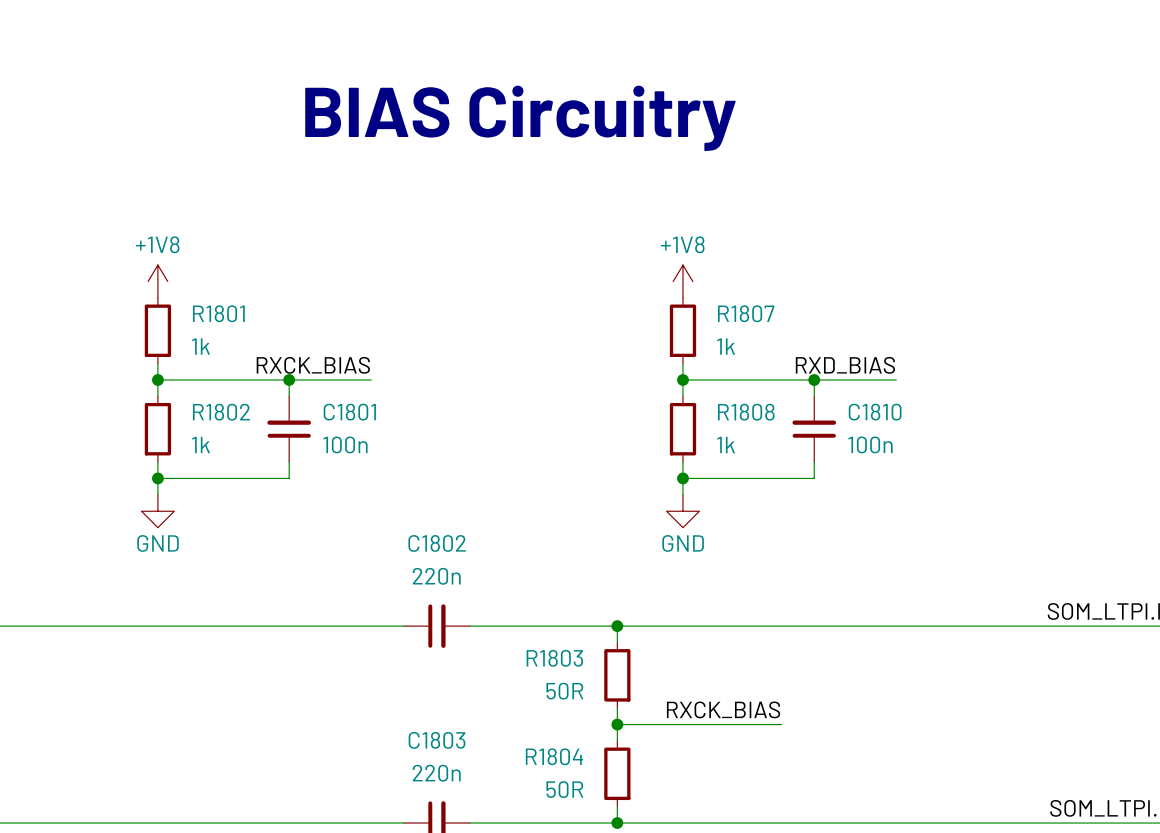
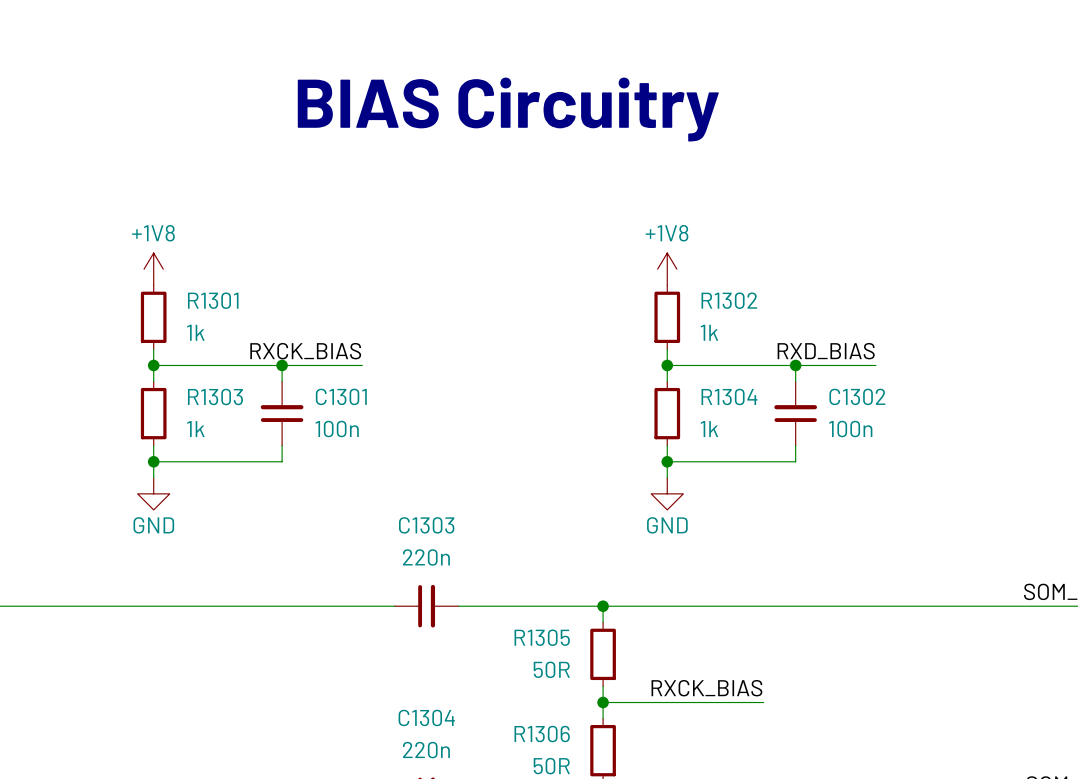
R1801 name: R1801 (218, 313) -> R1301 (213, 300)
R1807 name: R1807 (746, 313) -> R1302 (729, 300)
R1802 name: R1802 (221, 412) -> R1303 (215, 396)
C1801 name: C1801 (349, 412) -> C1301 (341, 396)
R1808 name: R1808 (746, 412) -> R1304 (729, 396)
C1810 name: C1810 (875, 412) -> C1302 (857, 396)
C1802 name: C1802 (437, 543) -> C1303 (426, 525)
R1803 name: R1803 (554, 658) -> R1305 (542, 637)
C1803 name: C1803 (437, 740) -> C1304 (426, 717)
R1804 name: R1804 (554, 756) -> R1306 (542, 734)

